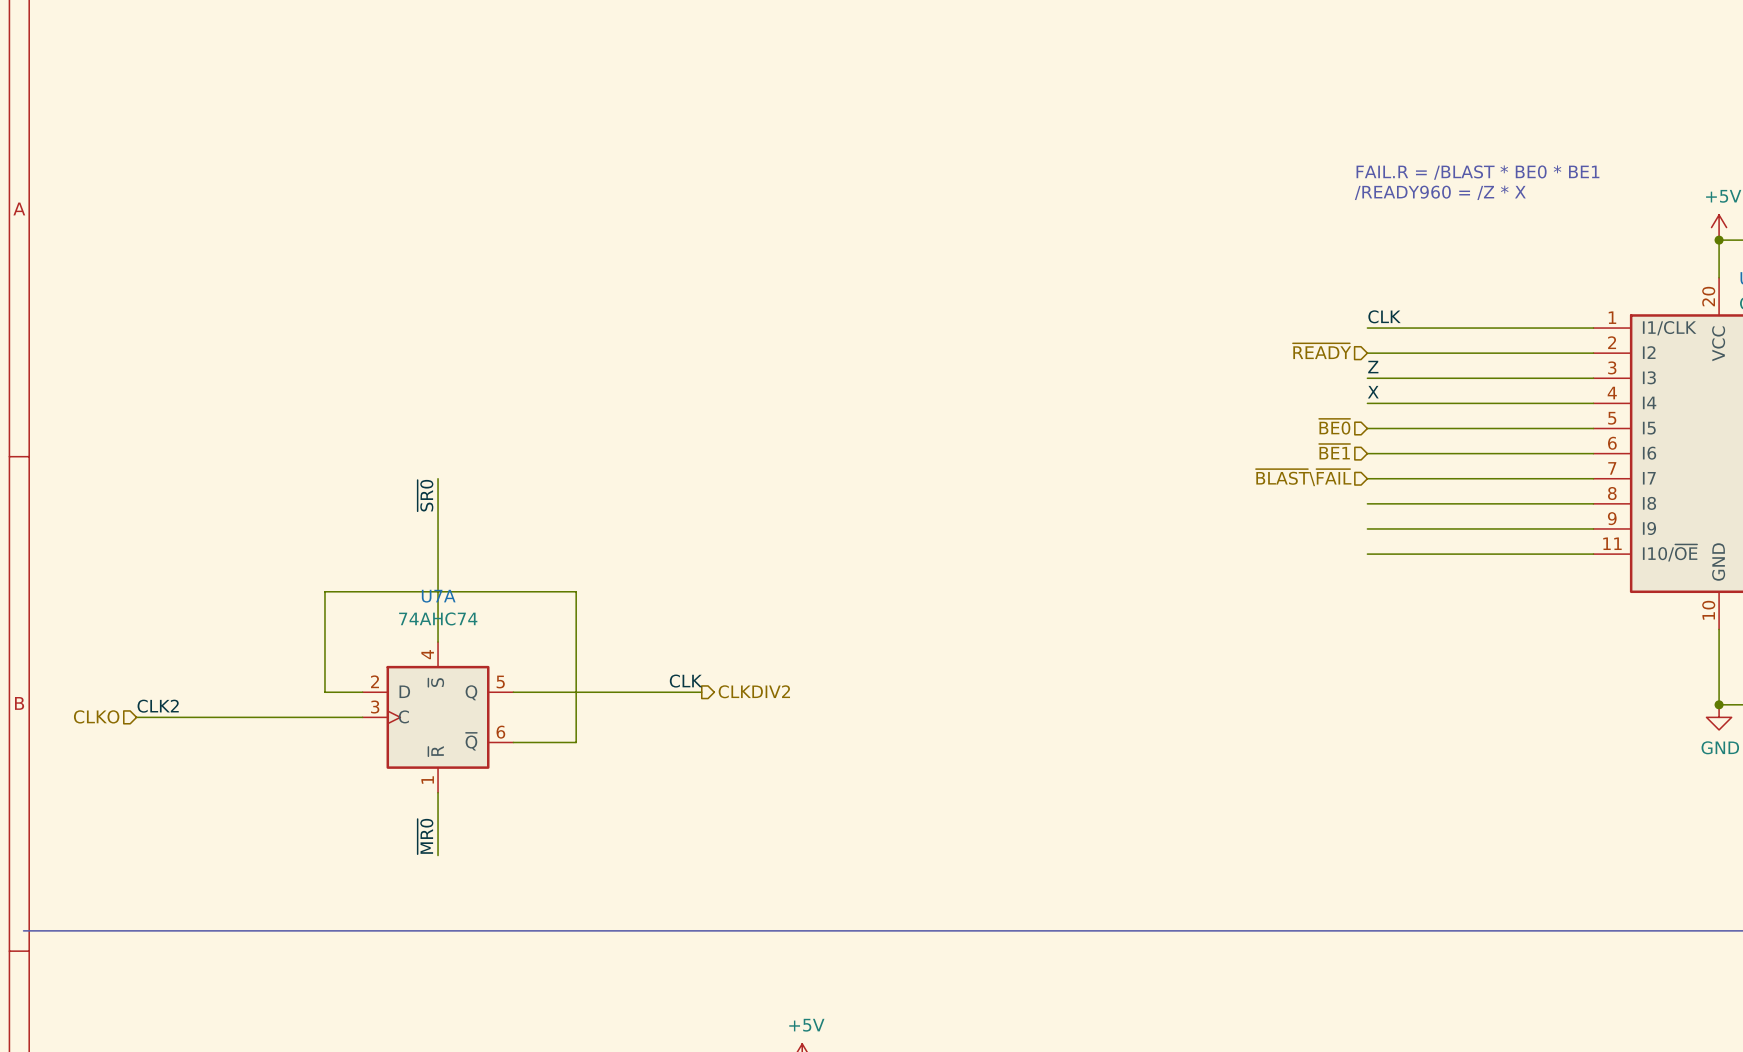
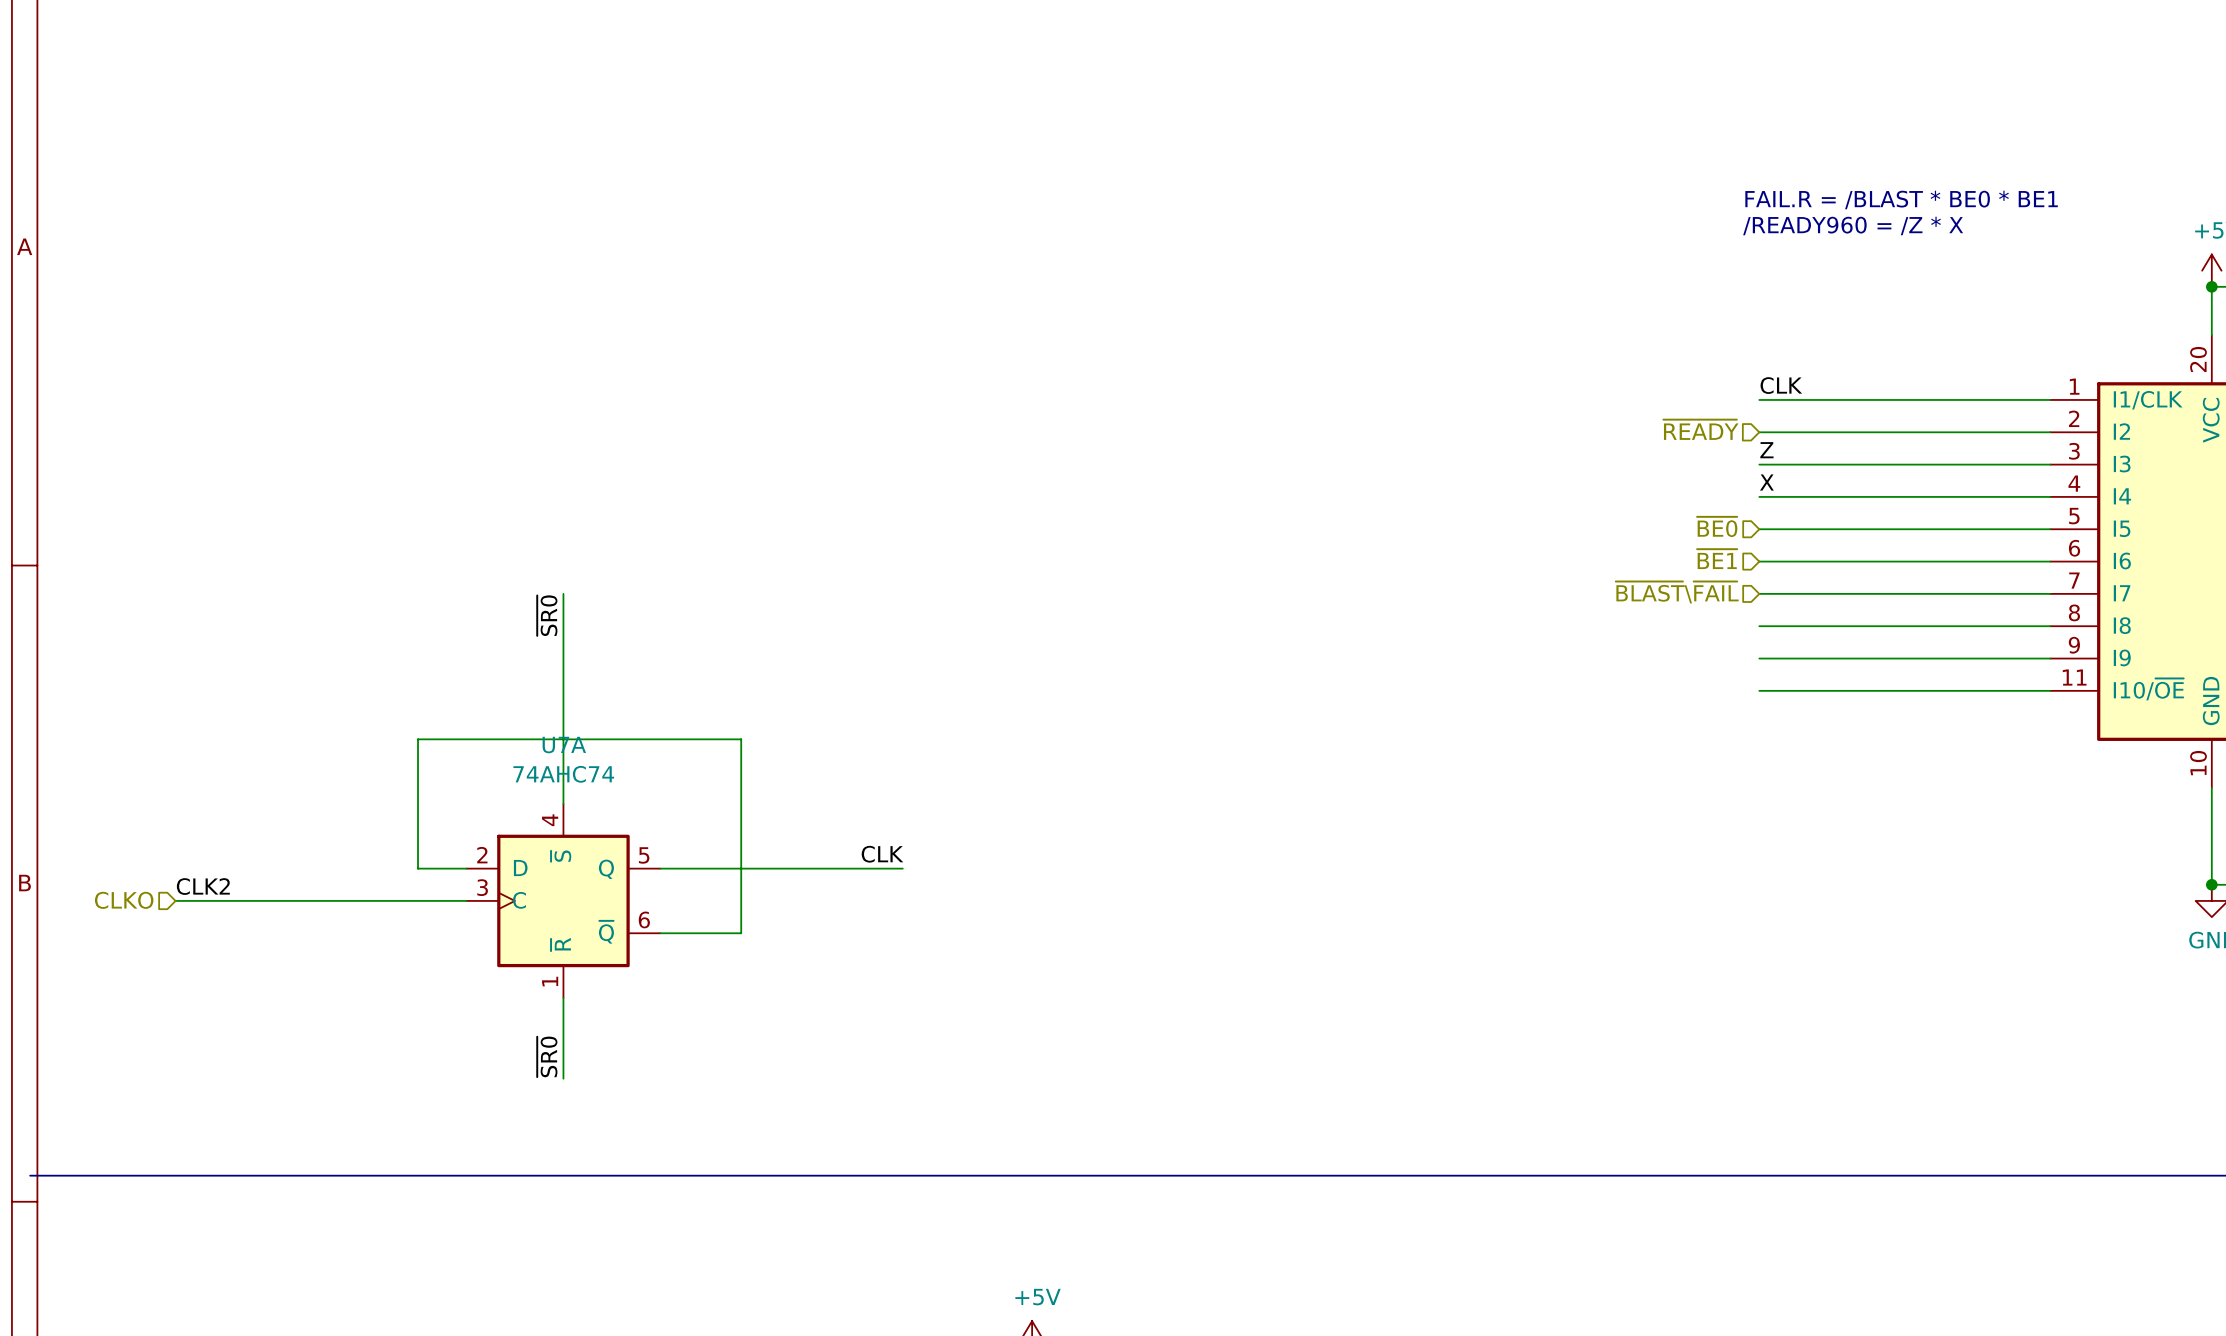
hierarchical label: CLKDIV2 (754, 691) -> none
label: ~{MR0} (425, 836) -> ~{SR0} (547, 1056)

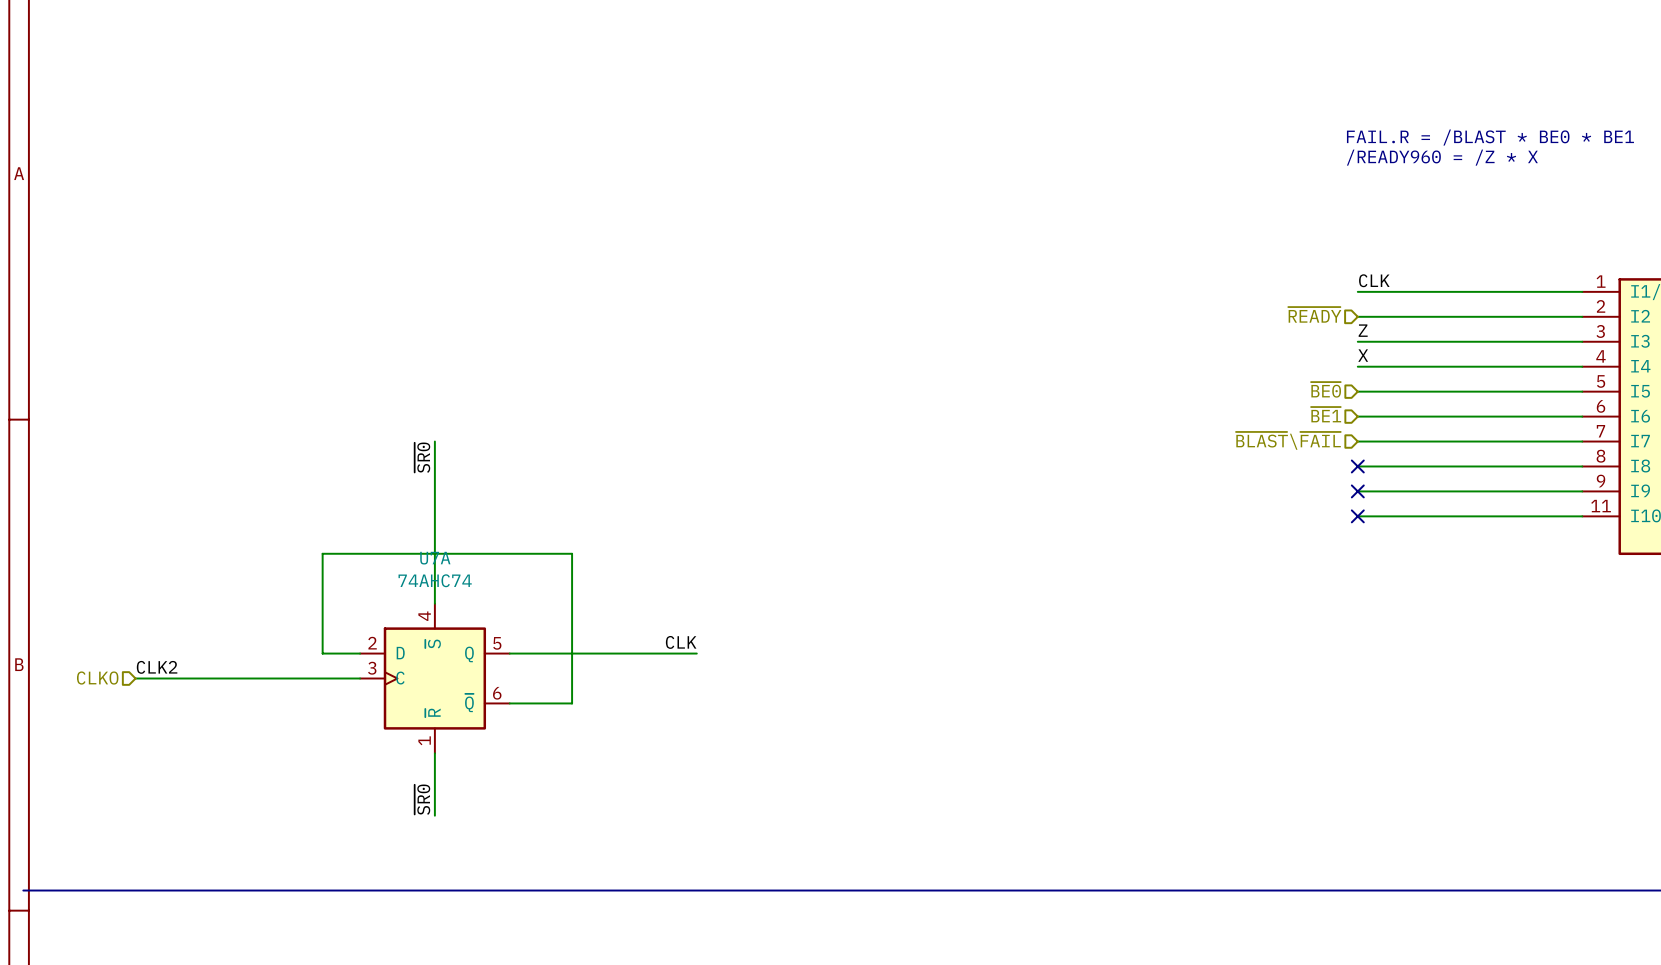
no-connect mark: none -> (1357, 466)
no-connect mark: none -> (1357, 491)
no-connect mark: none -> (1357, 516)

